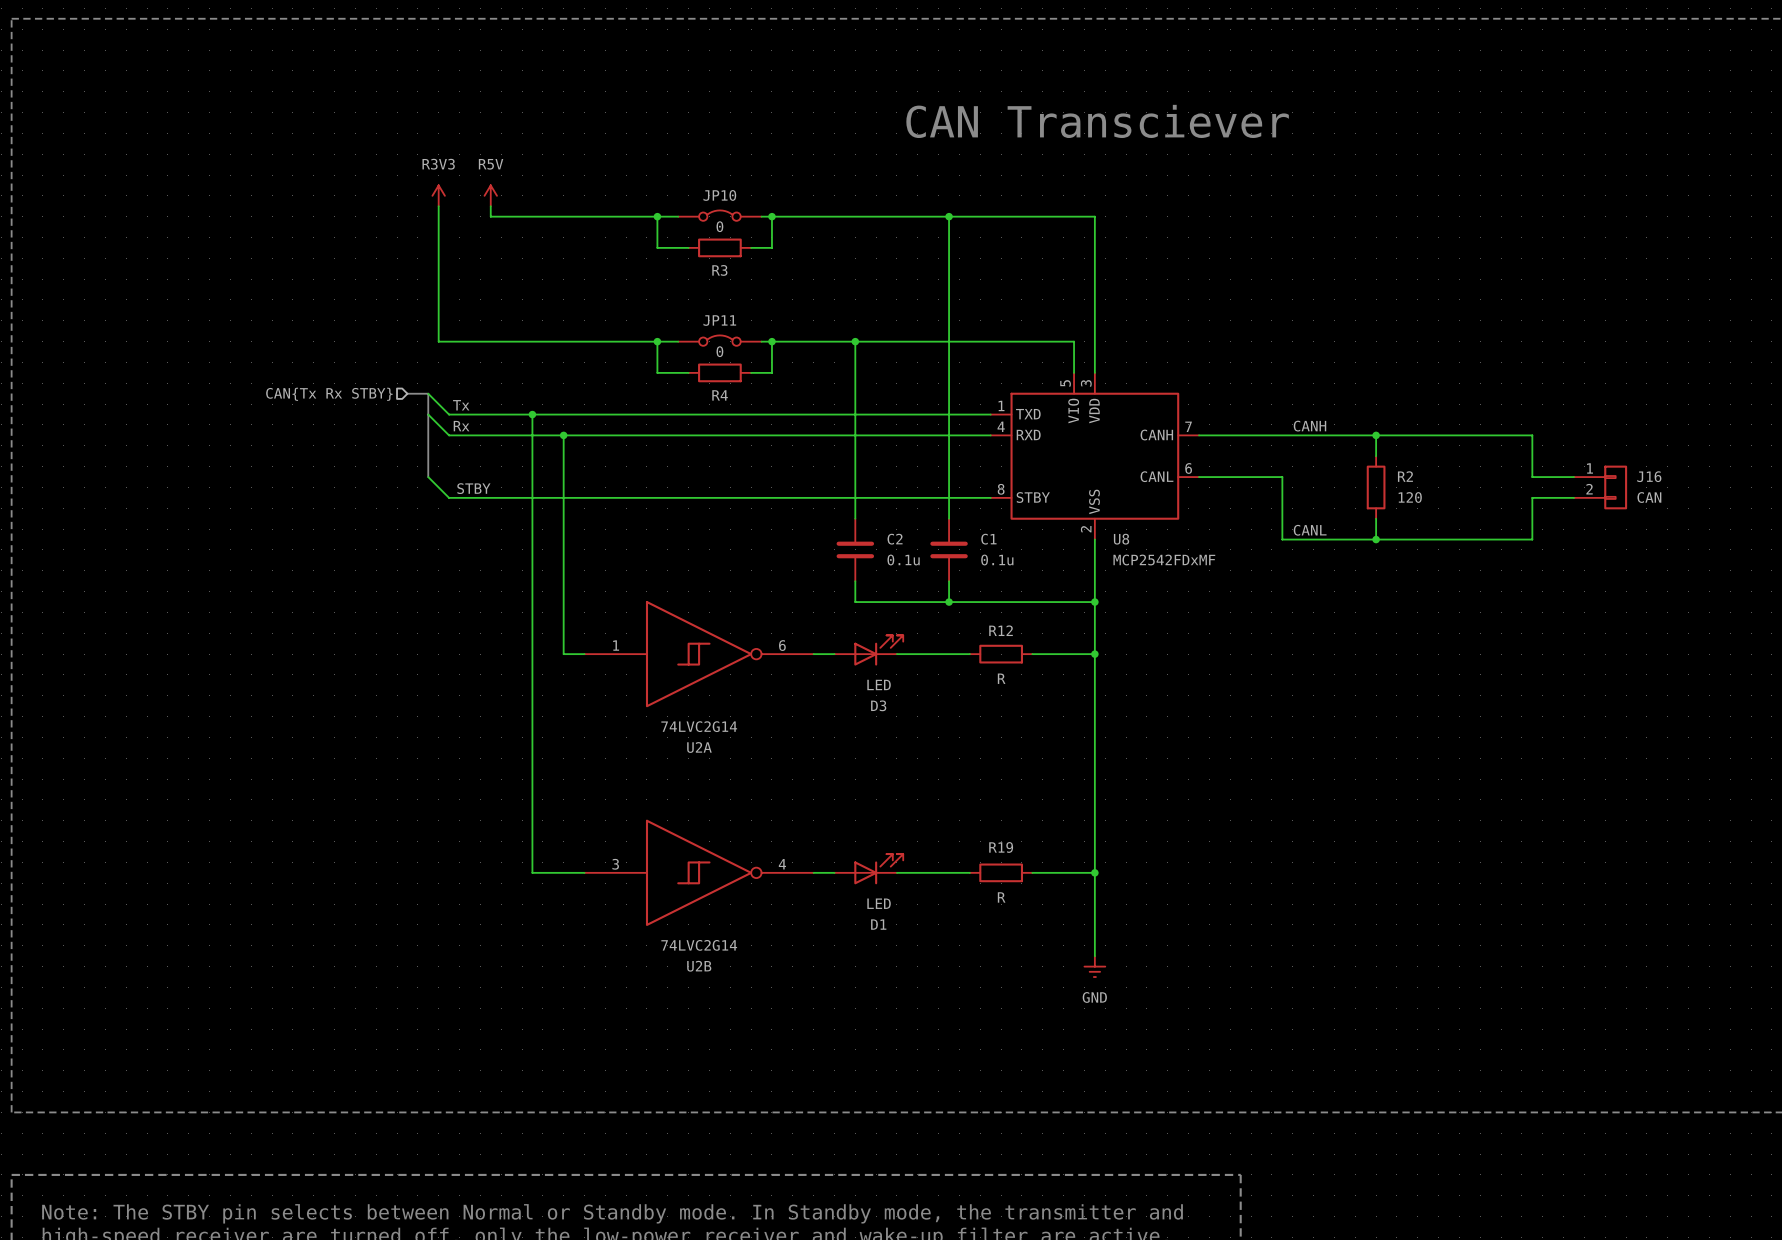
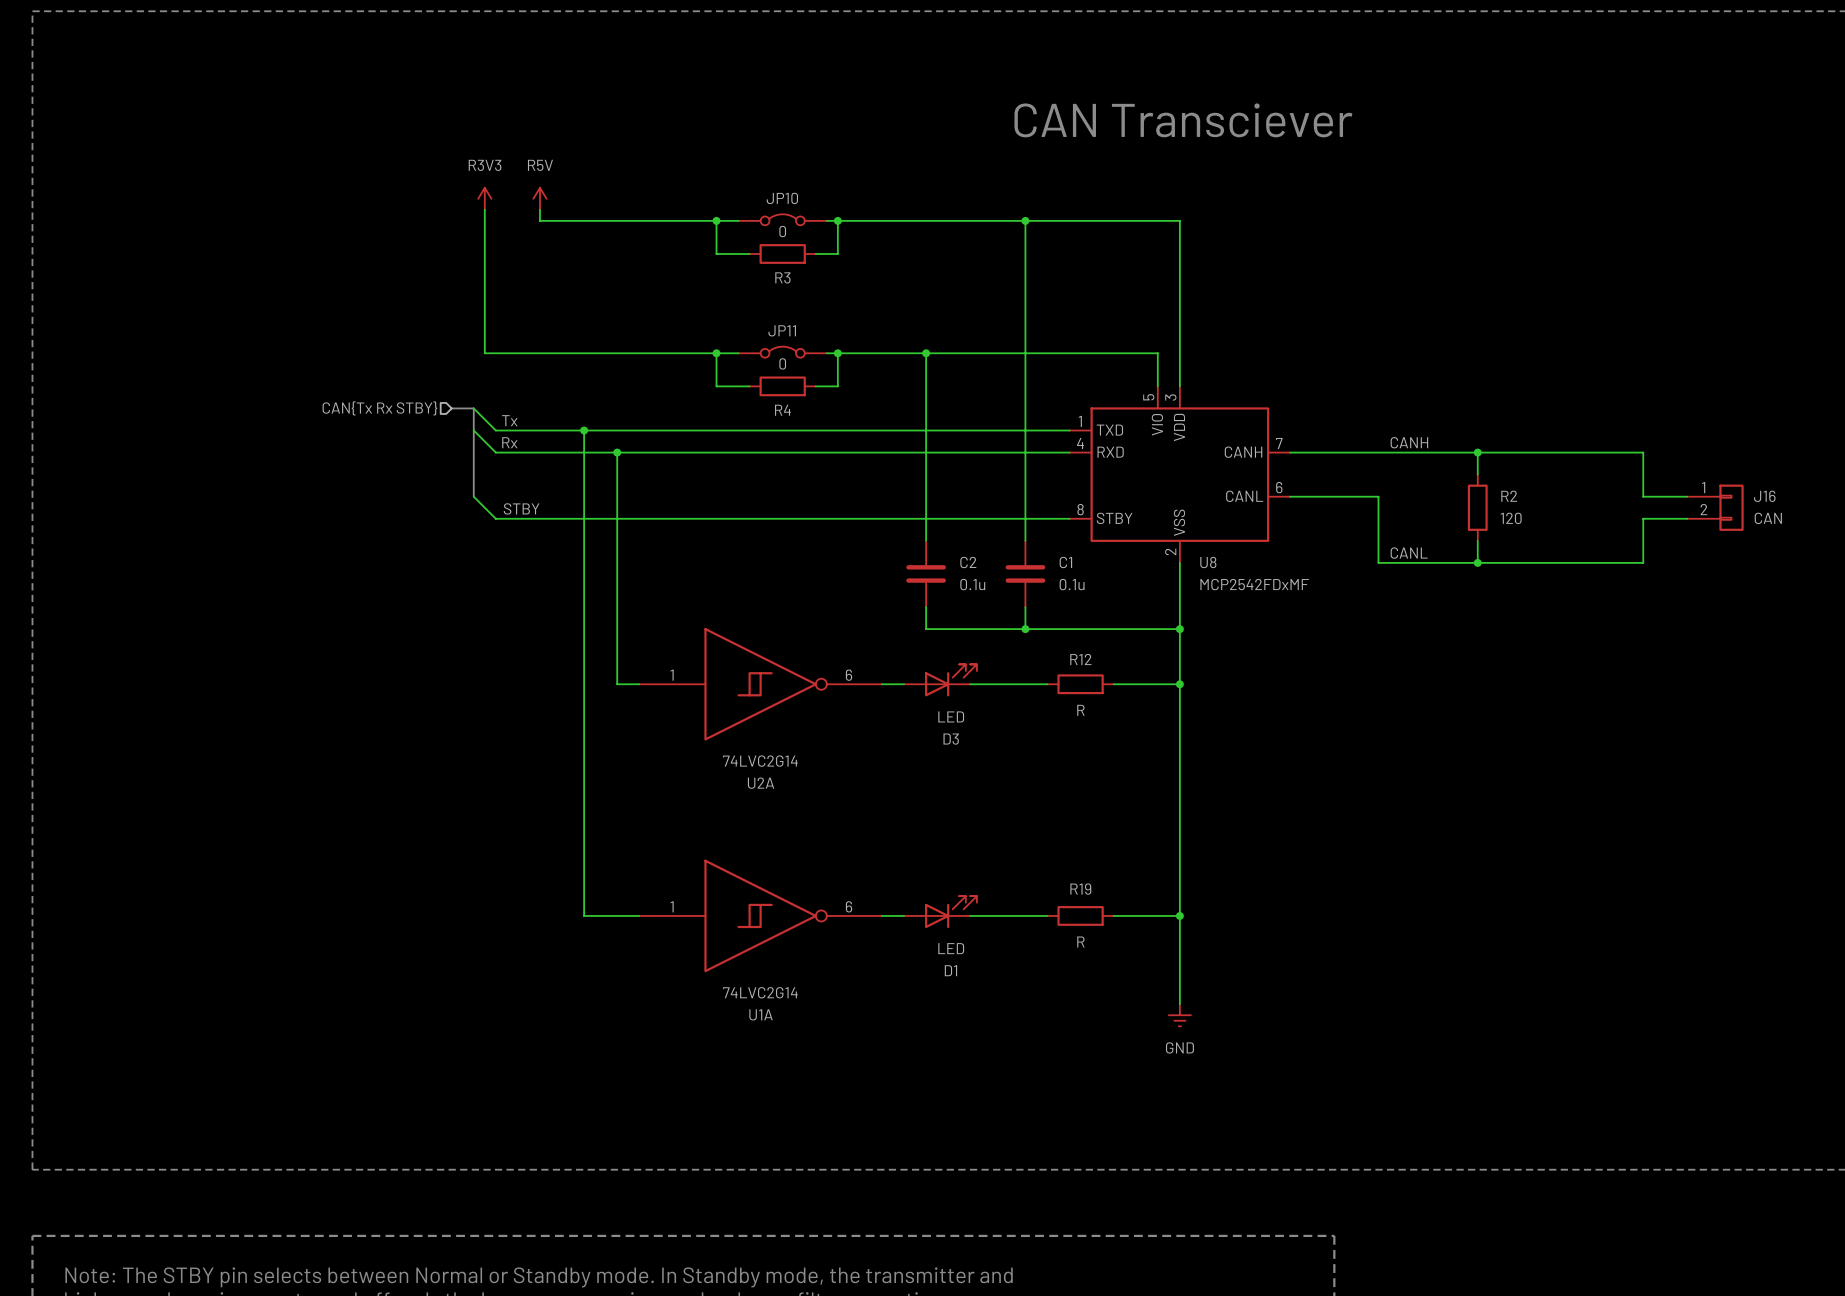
U2B pin number: 3 (615, 864) -> 1 (672, 906)
U2B pin number: 4 (782, 864) -> 6 (849, 906)
U2B name: U2B (699, 966) -> U1A (761, 1014)

